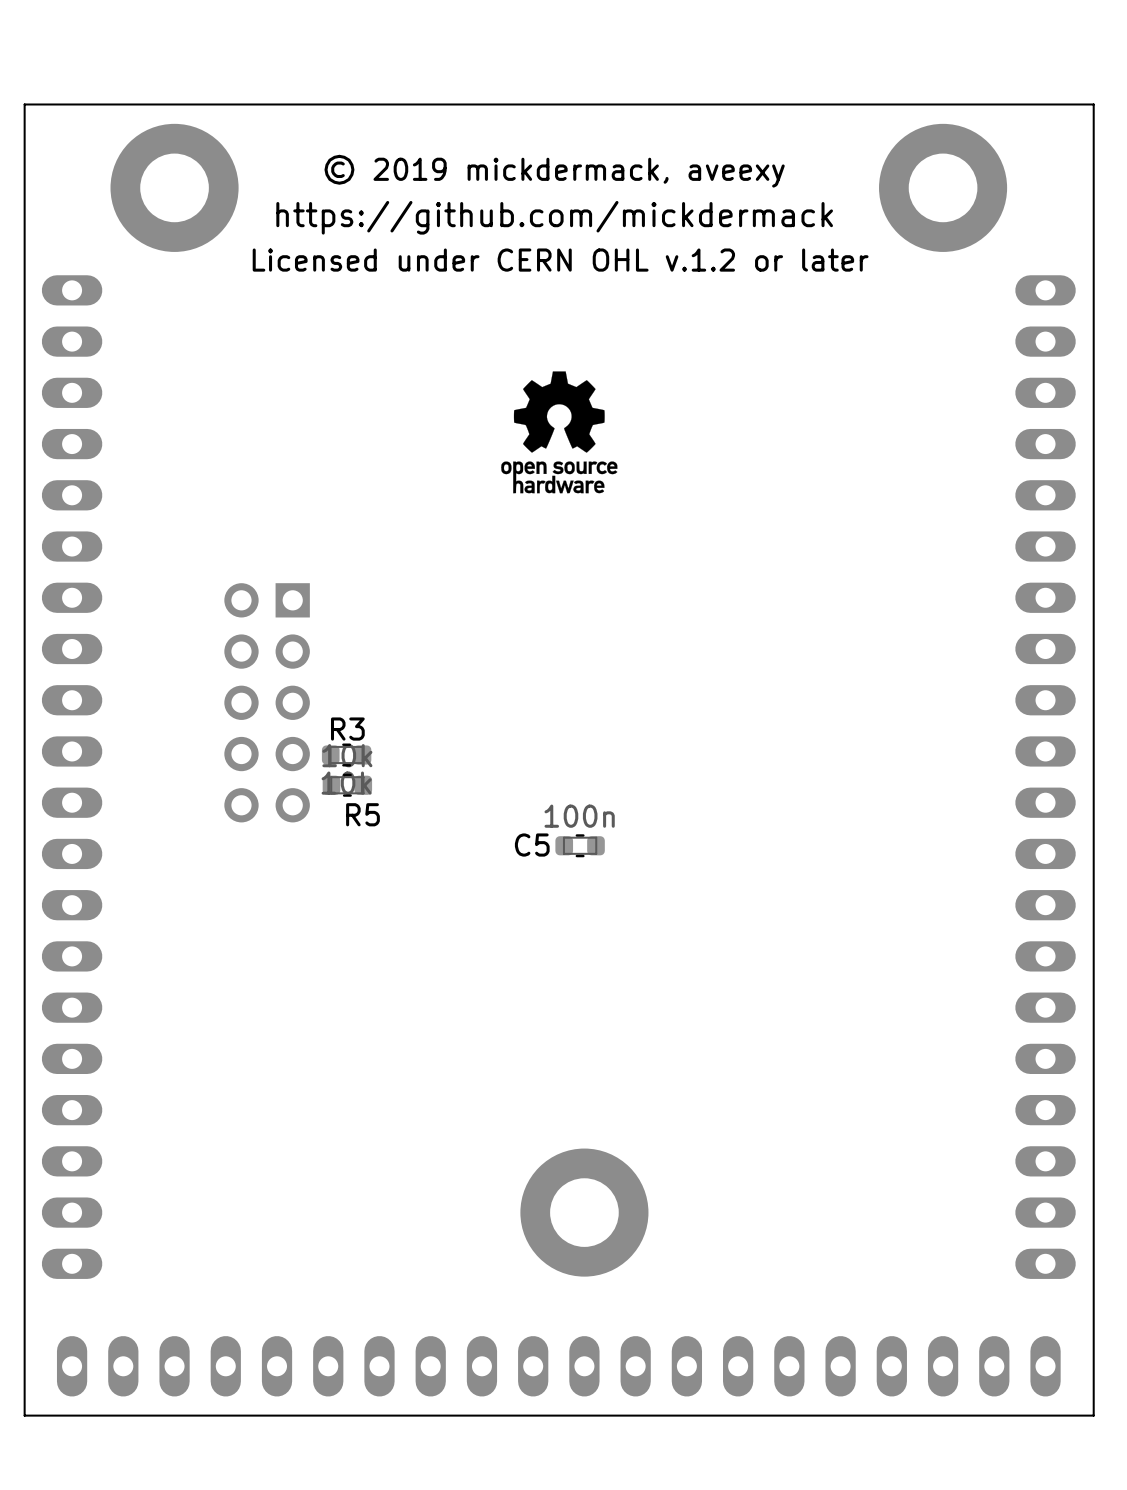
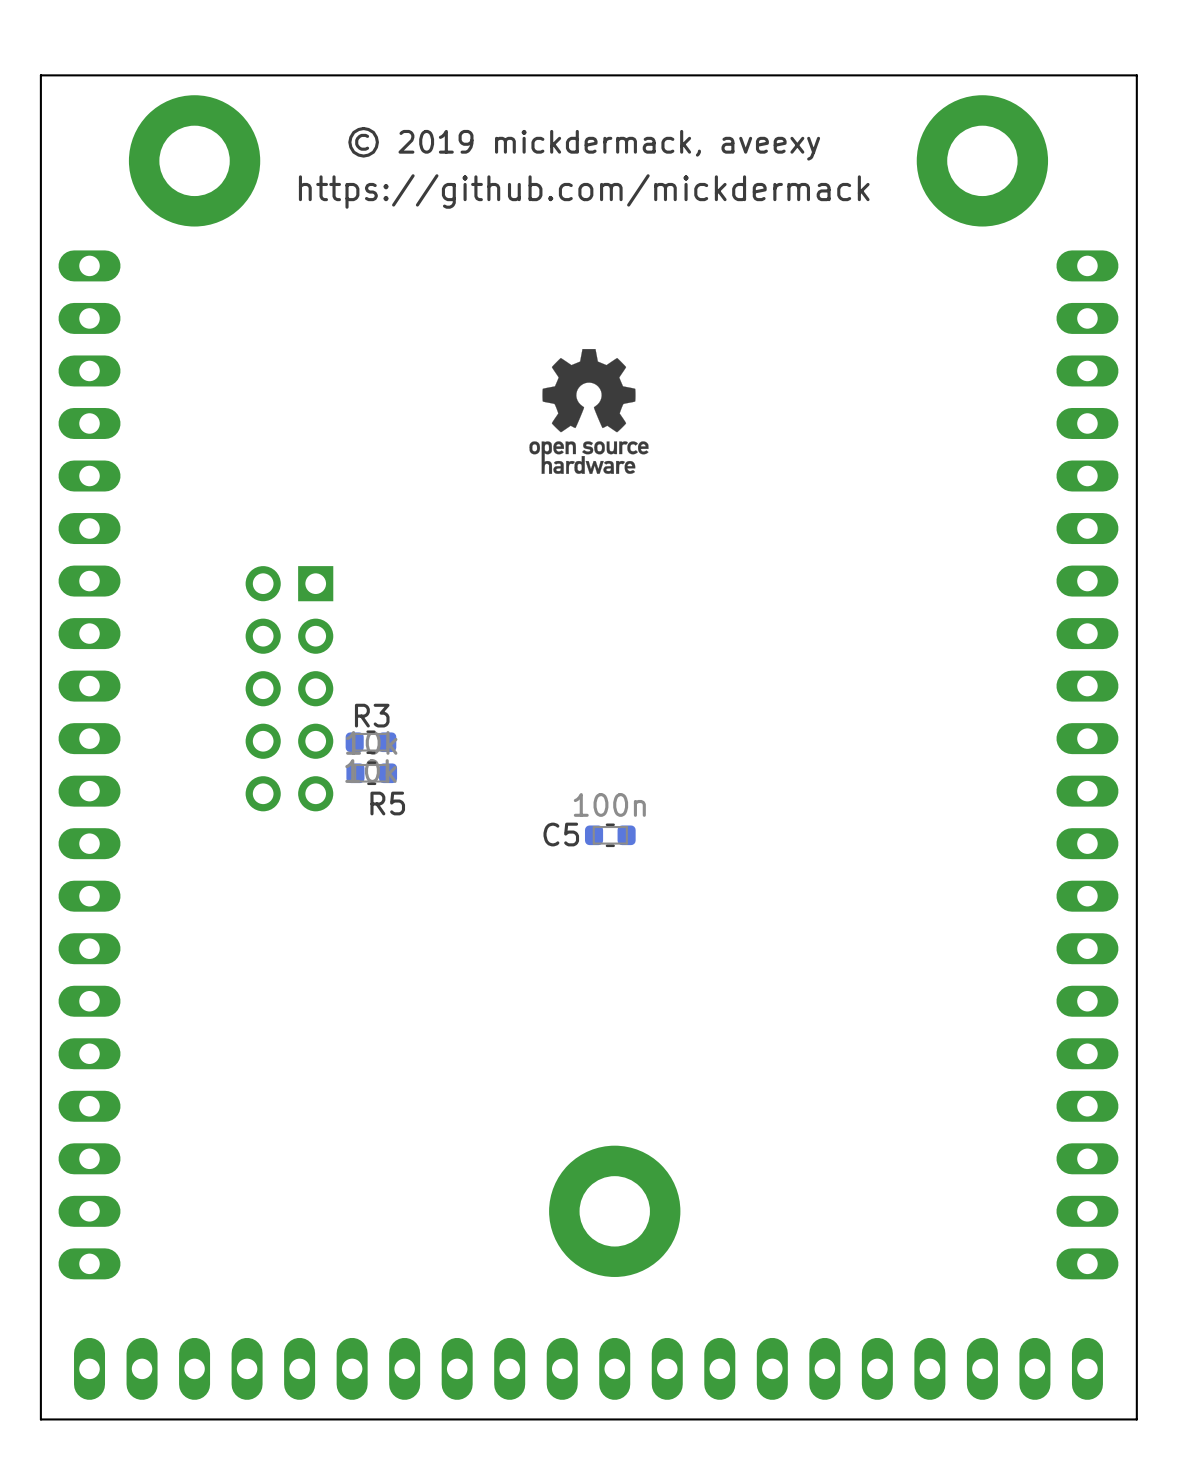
text: Licensed under CERN OHL v.1.2 or later (560, 260) -> none

